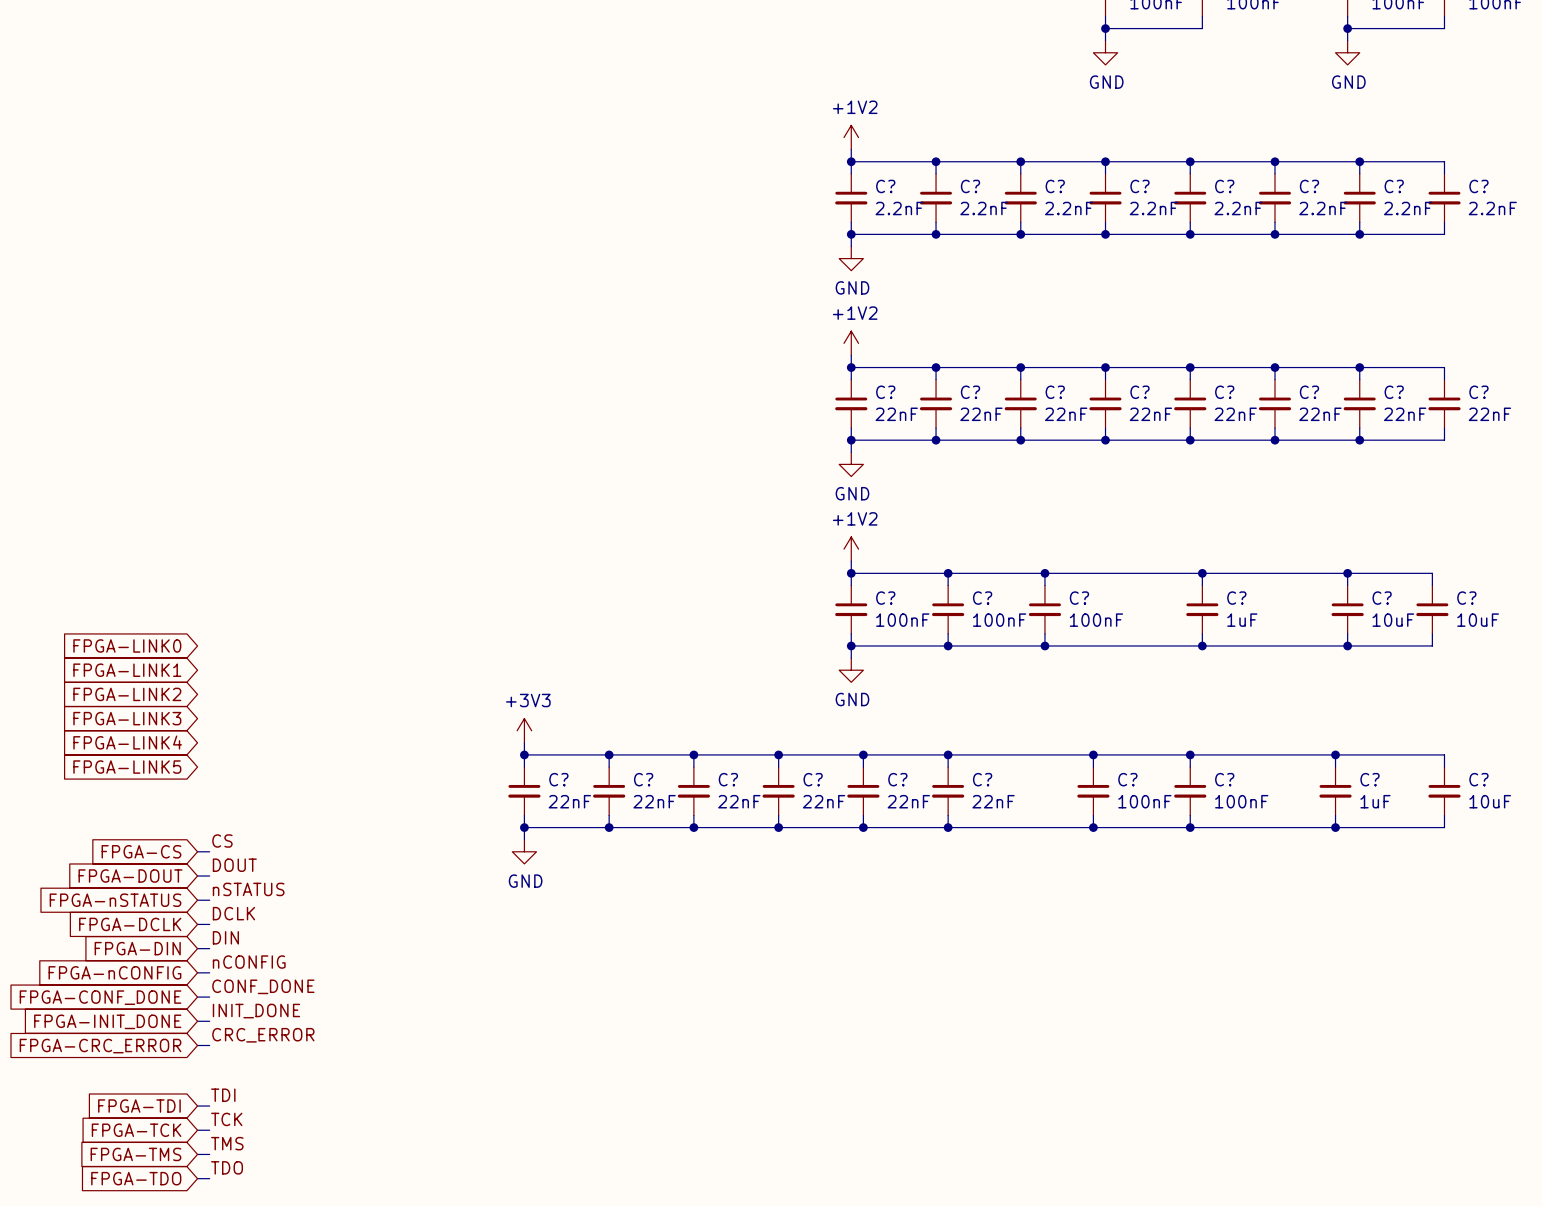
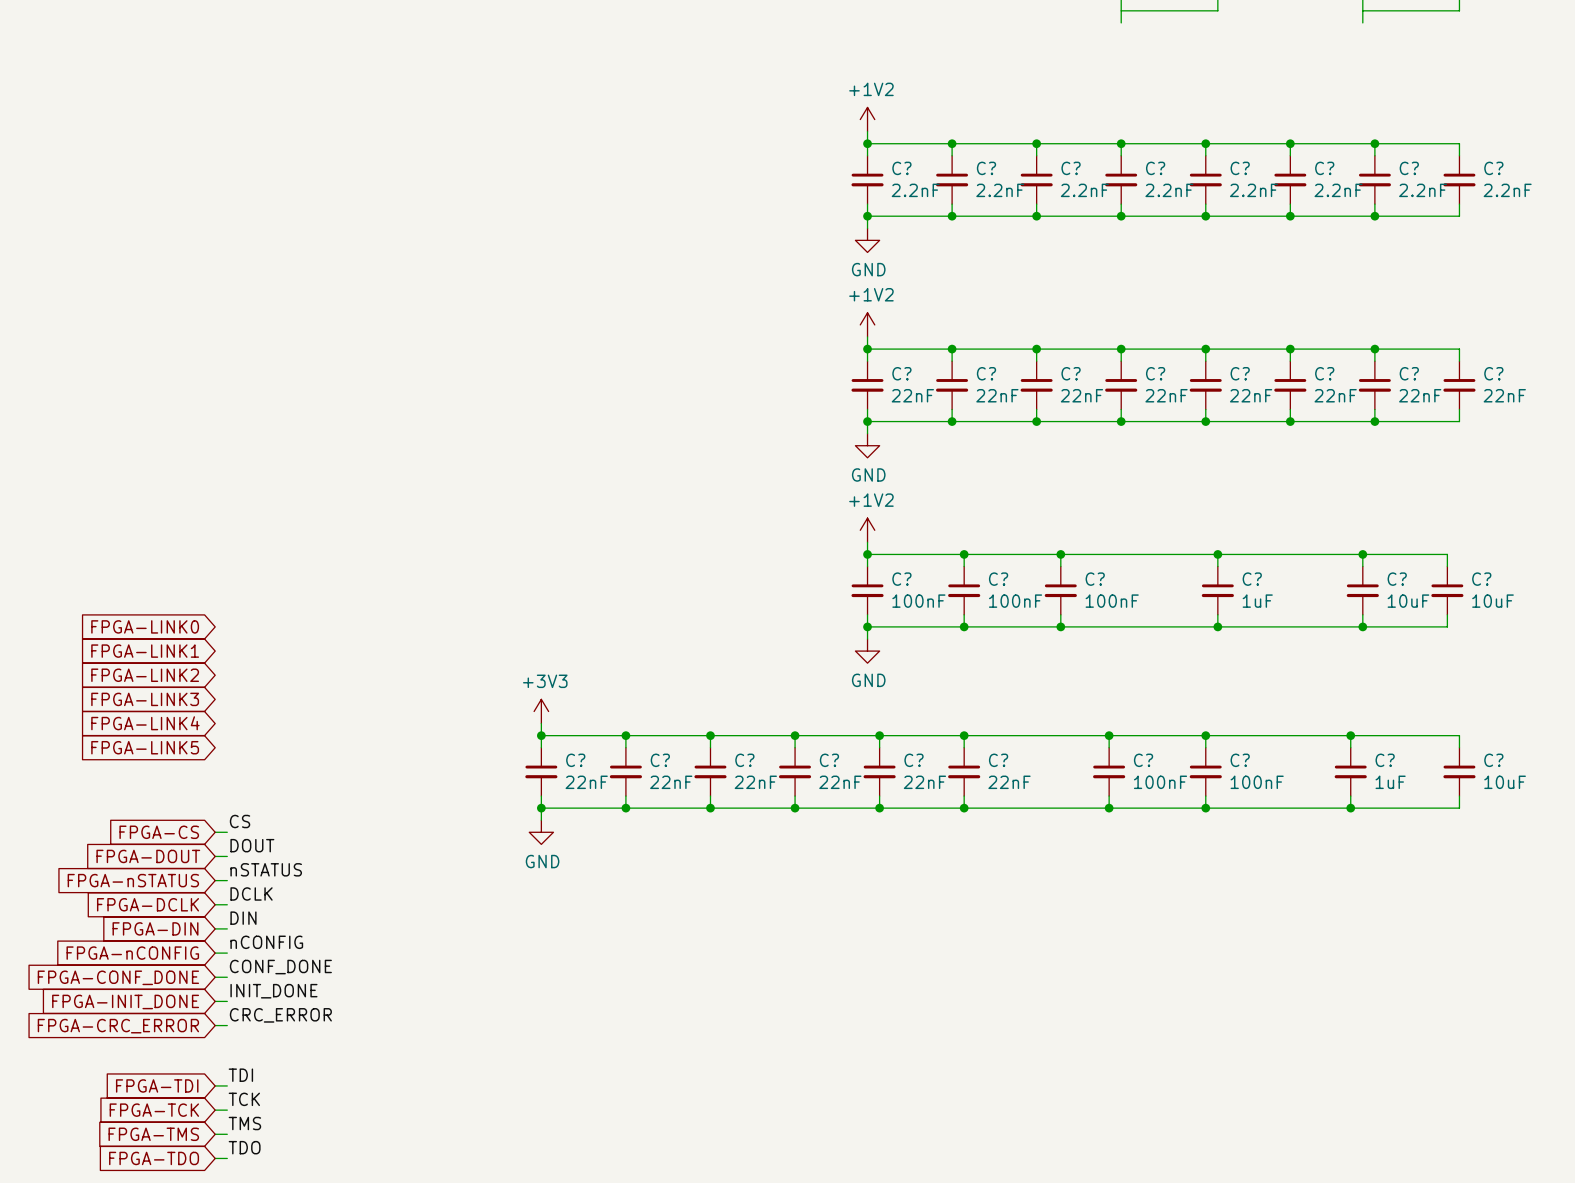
junction: (1105, 28) -> none
junction: (1347, 28) -> none
power symbol: GND (1105, 52) -> none
power symbol: GND (1347, 52) -> none

